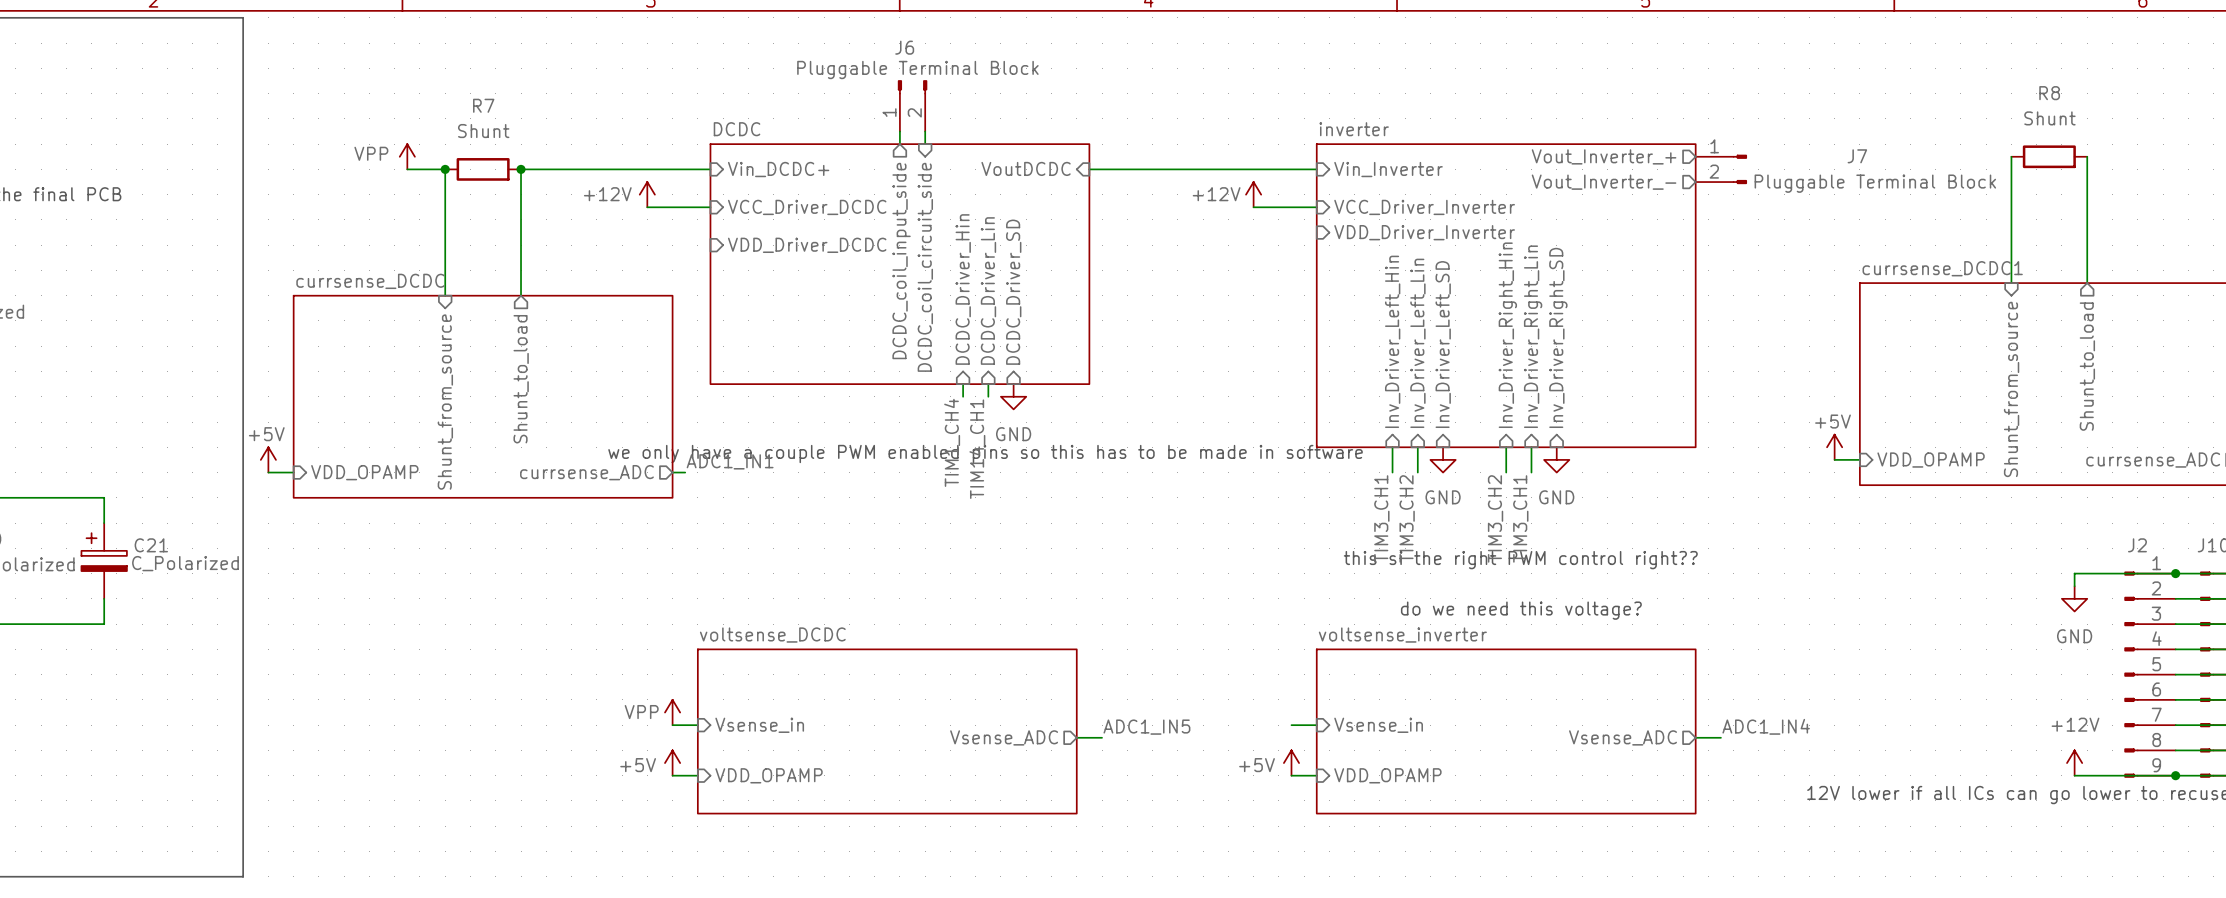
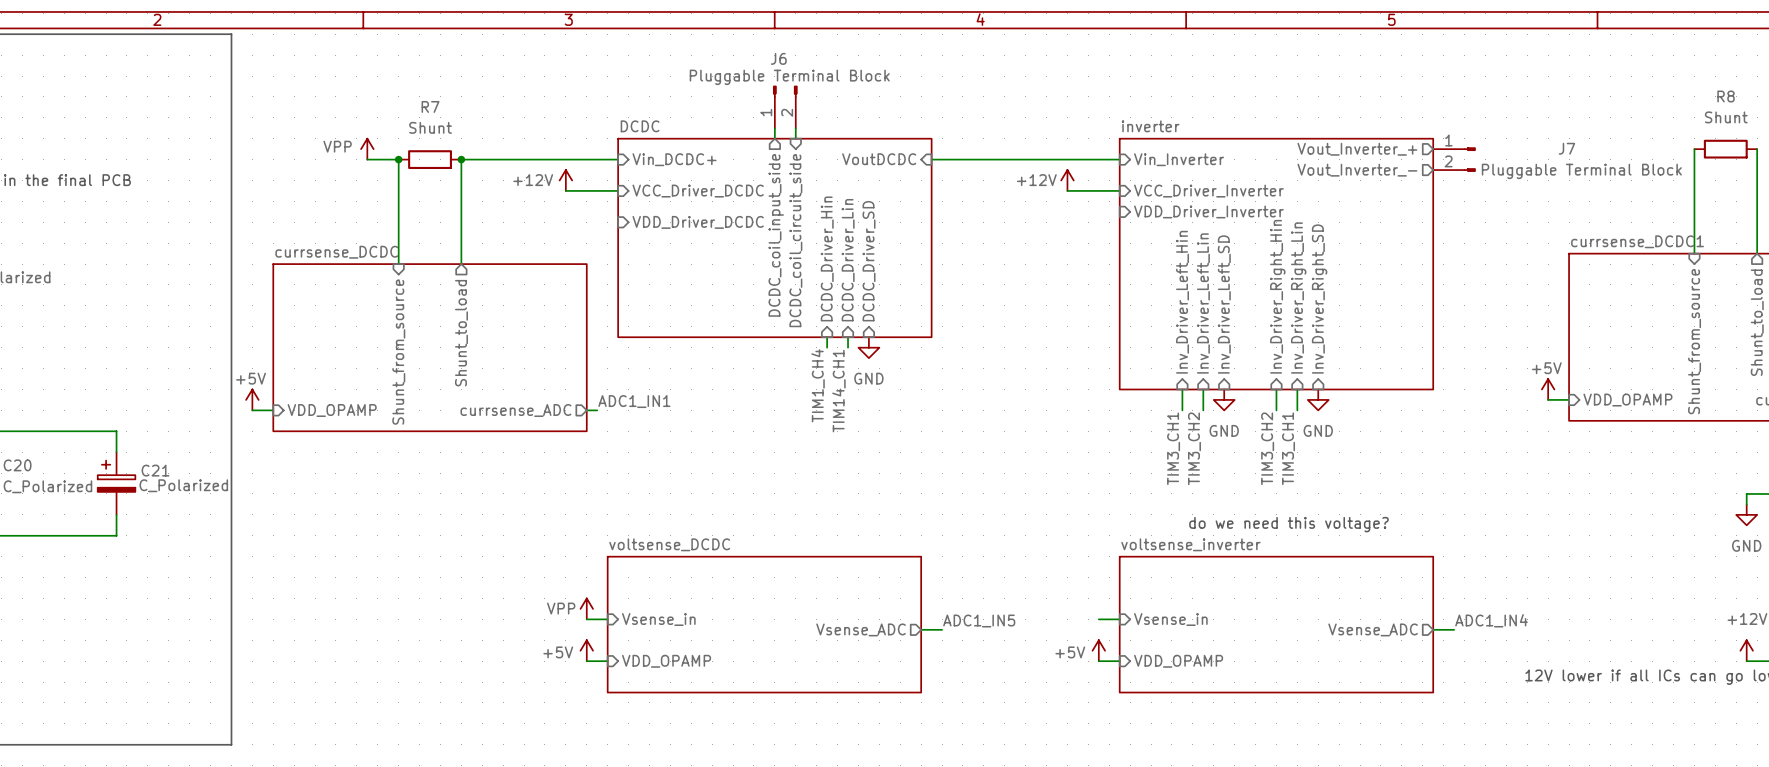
text: we only have a couple PWM enabled pins so this has to be made in software (985, 454) -> none
text: this si the right PWM control right?? (1520, 560) -> none

